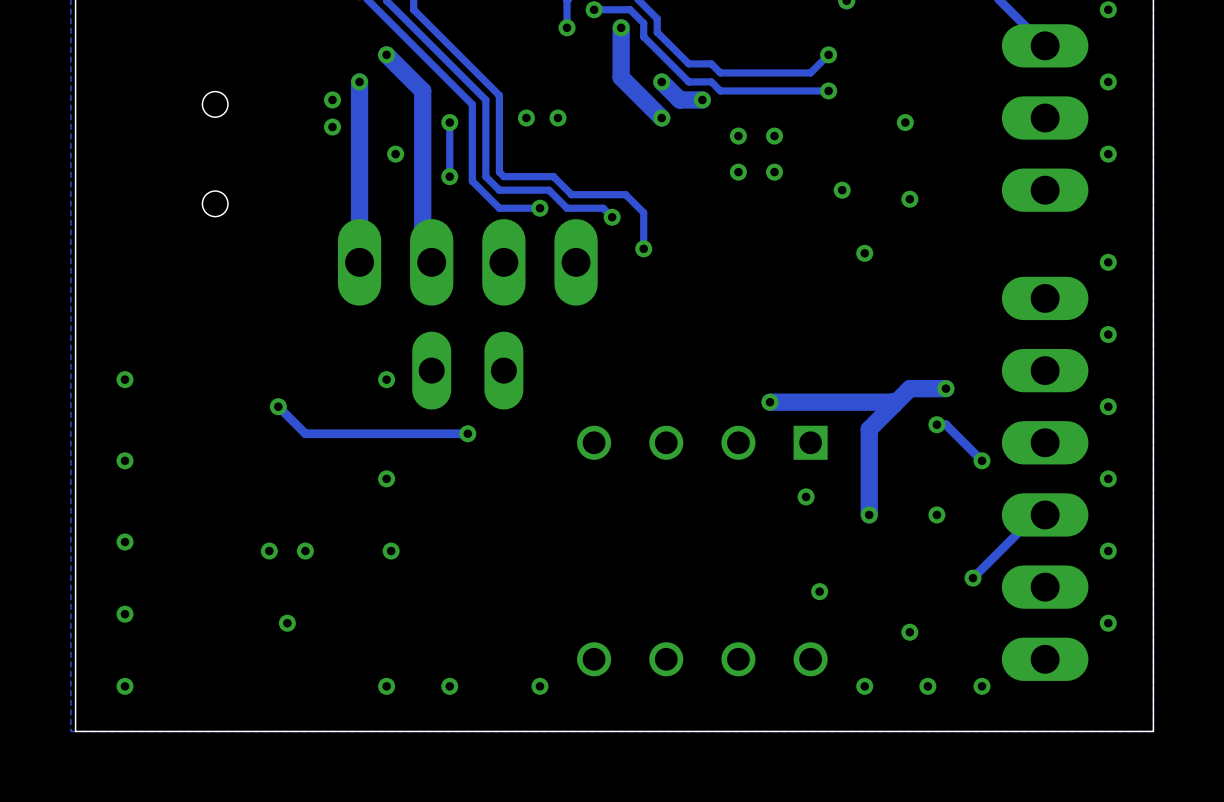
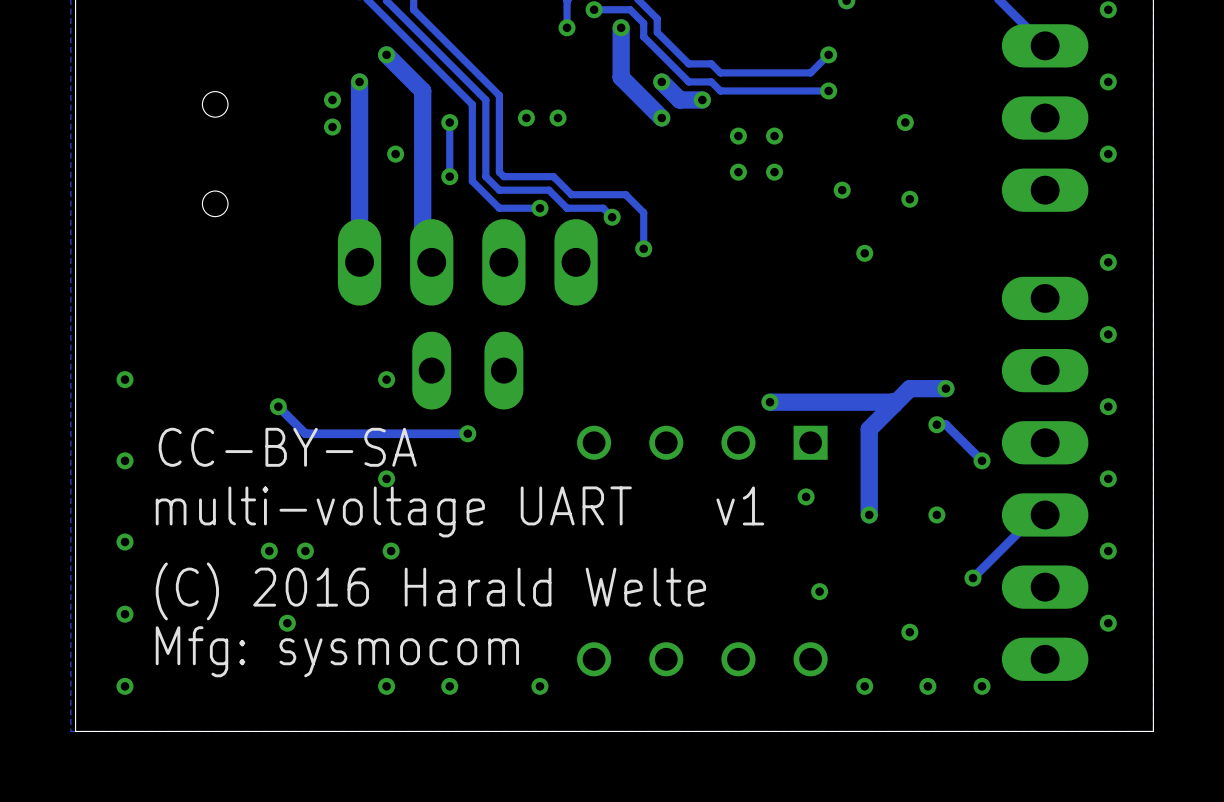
text: none -> CC-BY-SA (287, 447)
text: none -> v1 (740, 505)
text: none -> multi-voltage UART (393, 511)
text: none -> (C) 2016 Harald Welte (430, 591)
text: none -> Mfg: sysmocom (337, 651)

